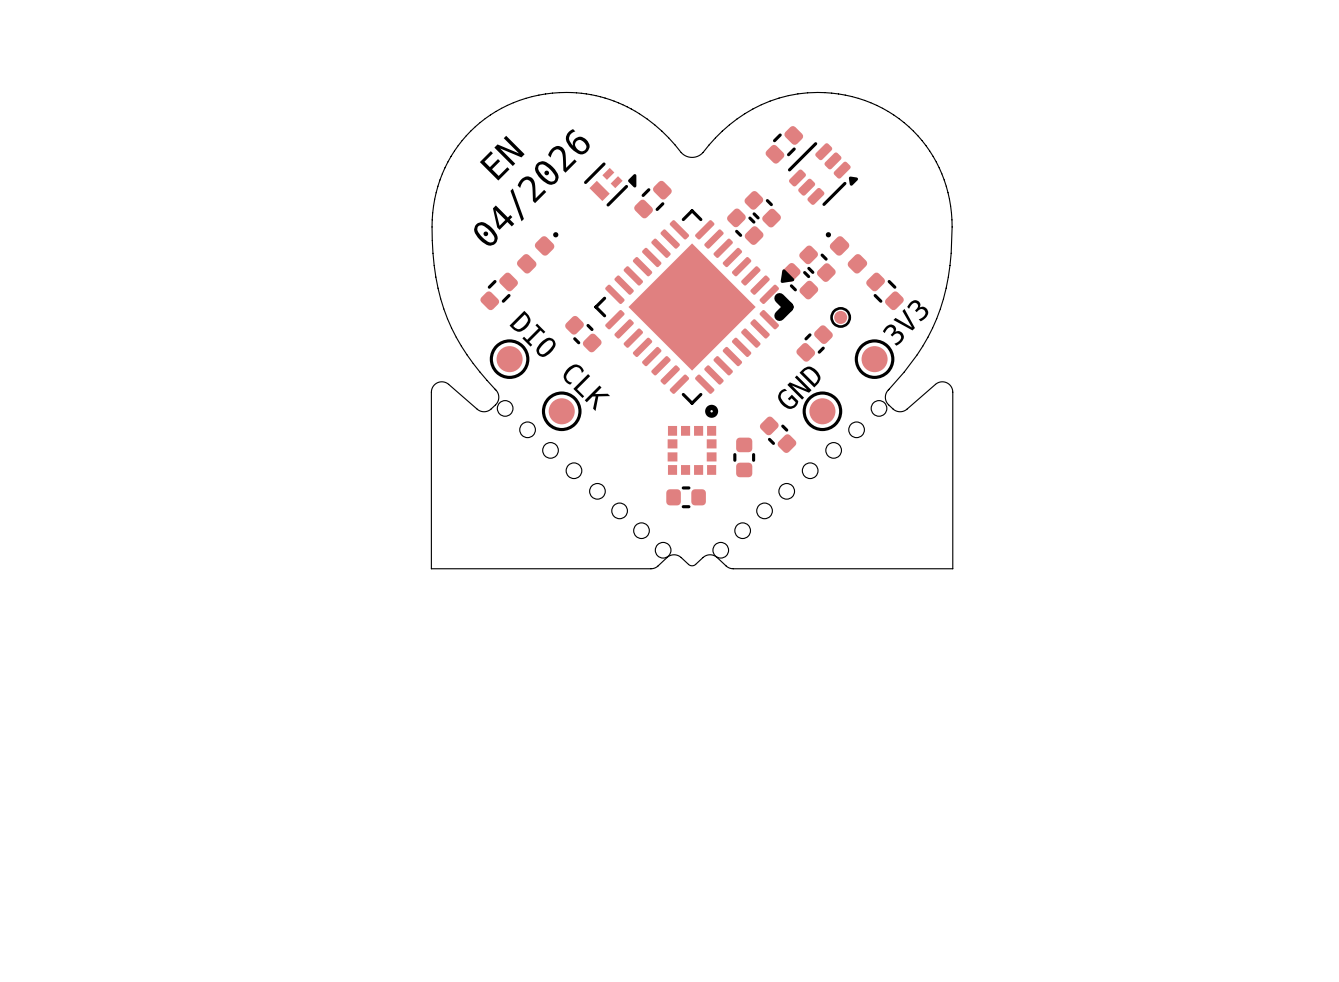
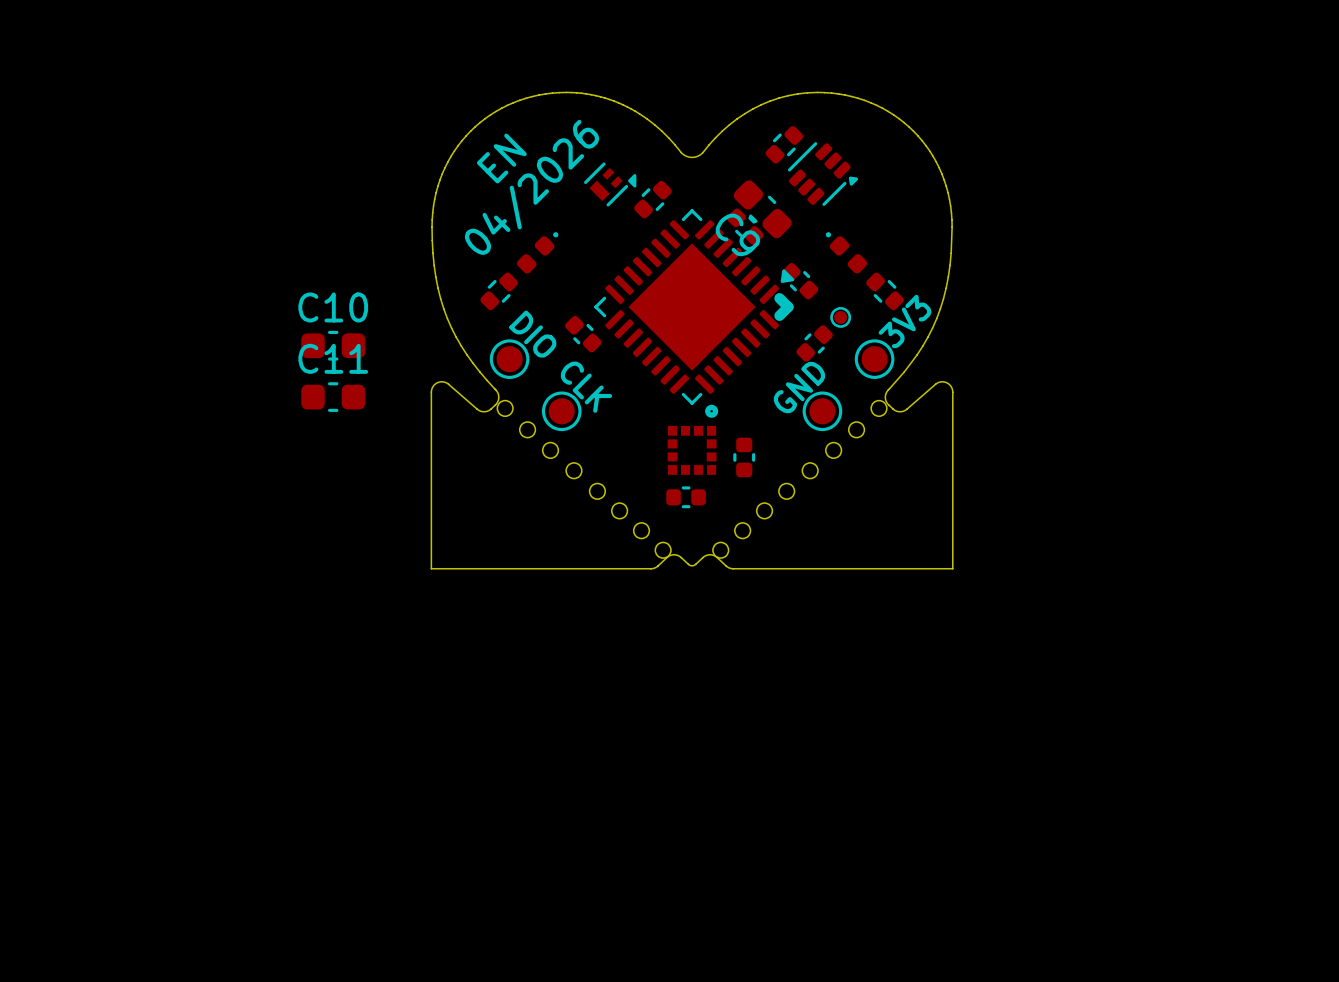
part: (762, 209) -> none
C9: none -> (762, 209)
part: (817, 263) -> none
C10: none -> (333, 345)
C11: none -> (333, 397)
part: (778, 434) -> none

